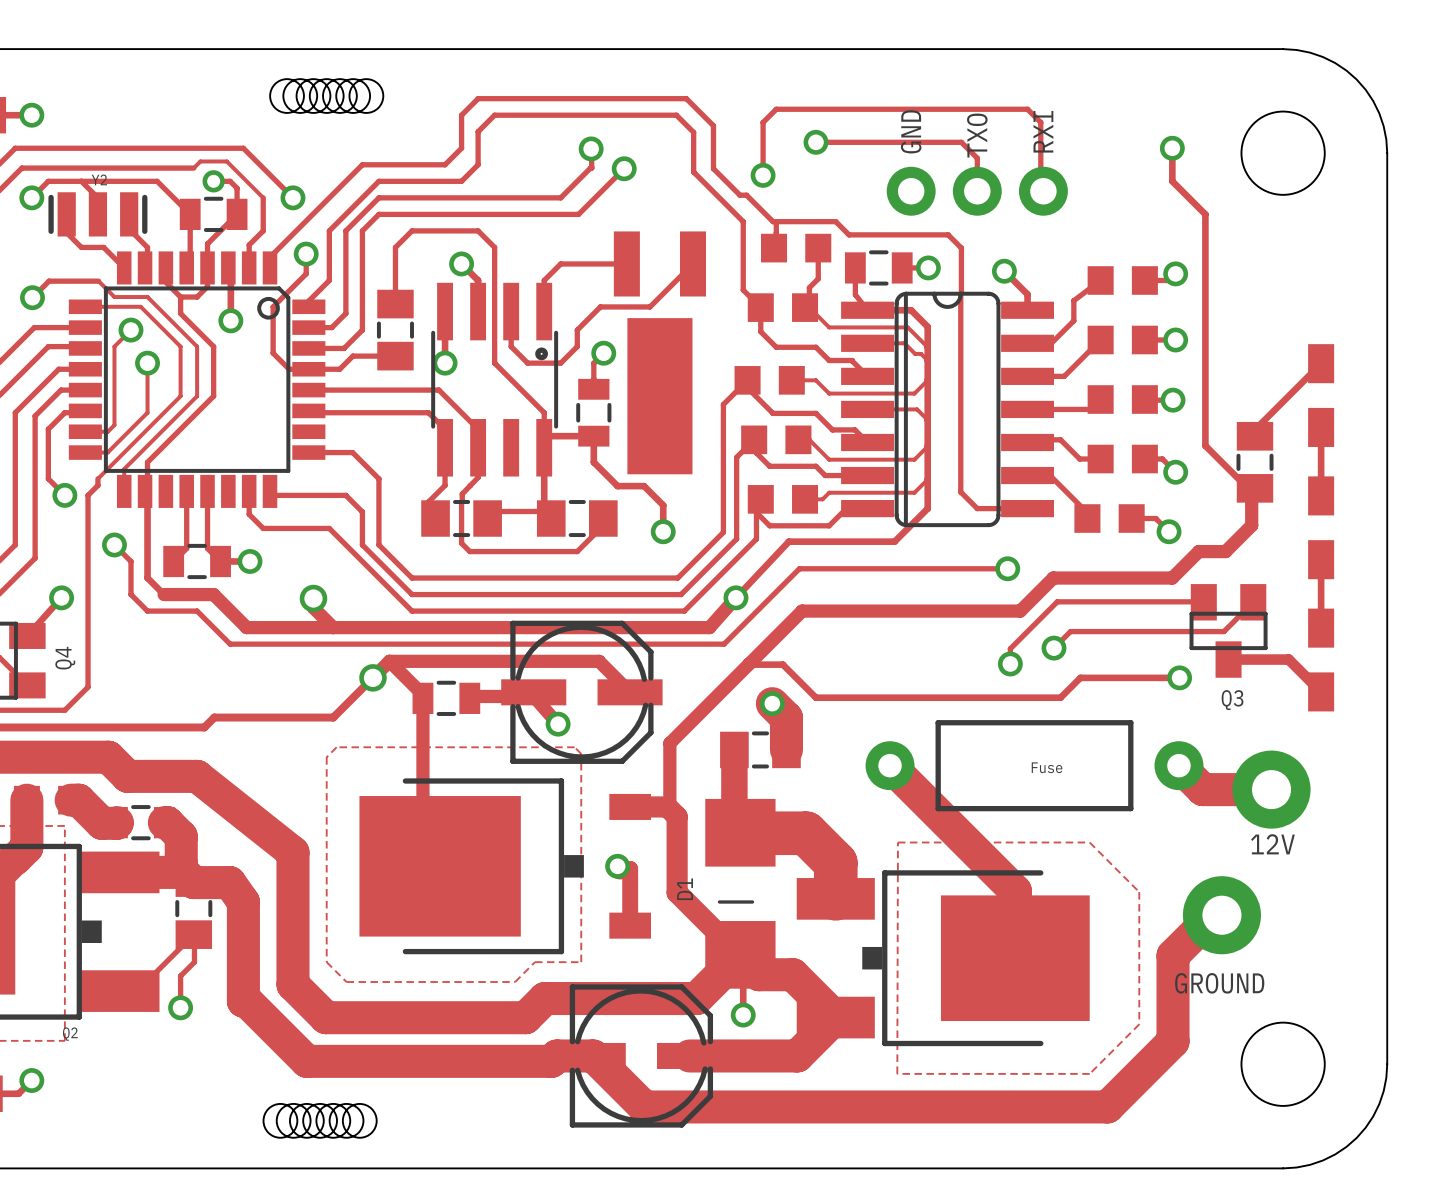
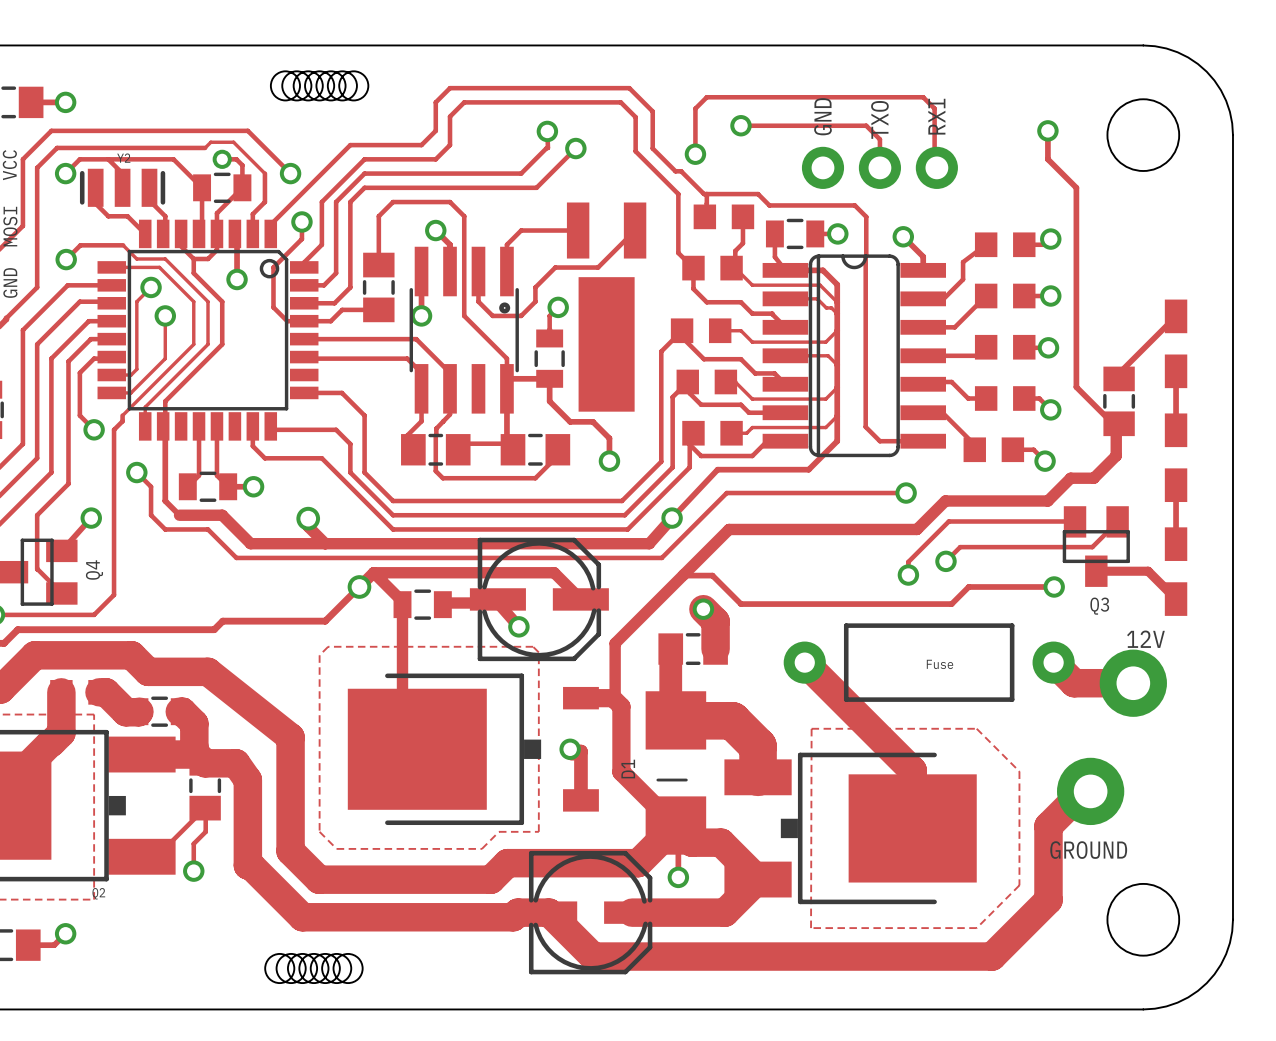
12V name position: 12V (1272, 844) -> 12V (1145, 639)

